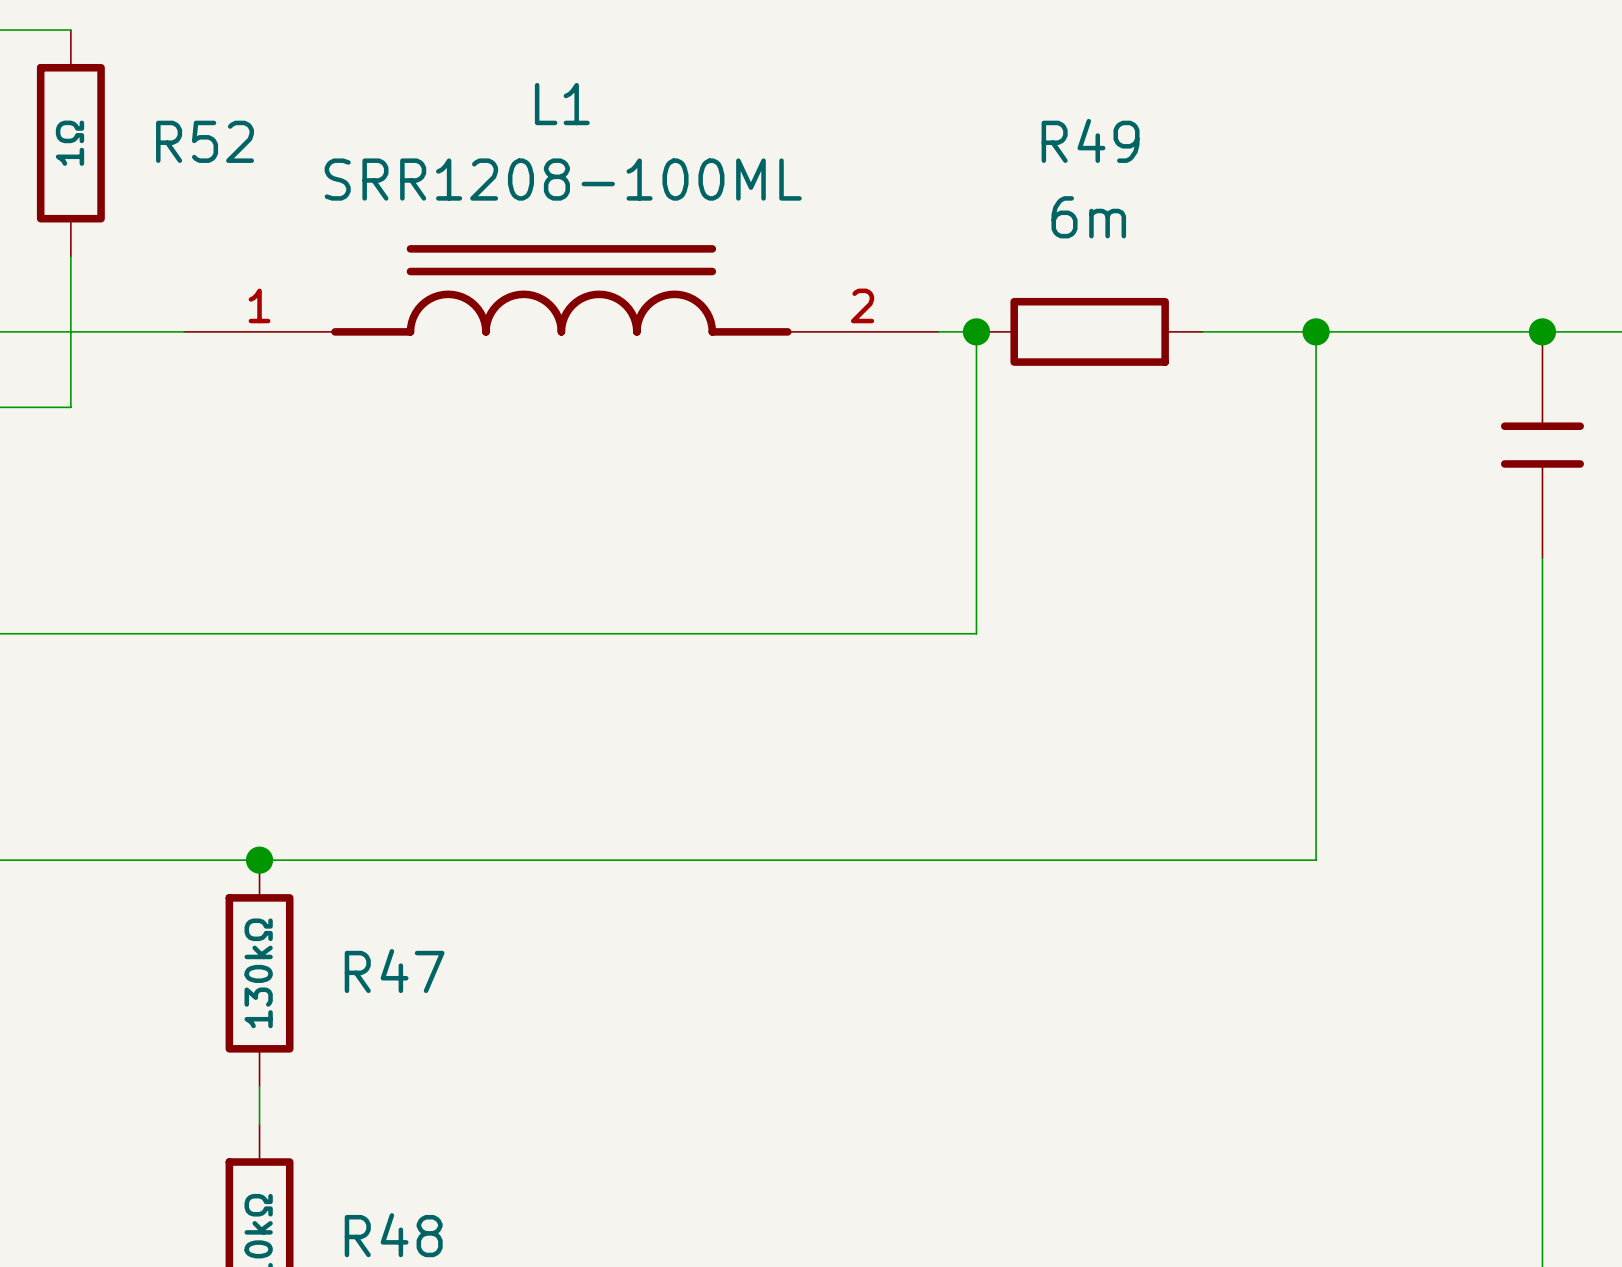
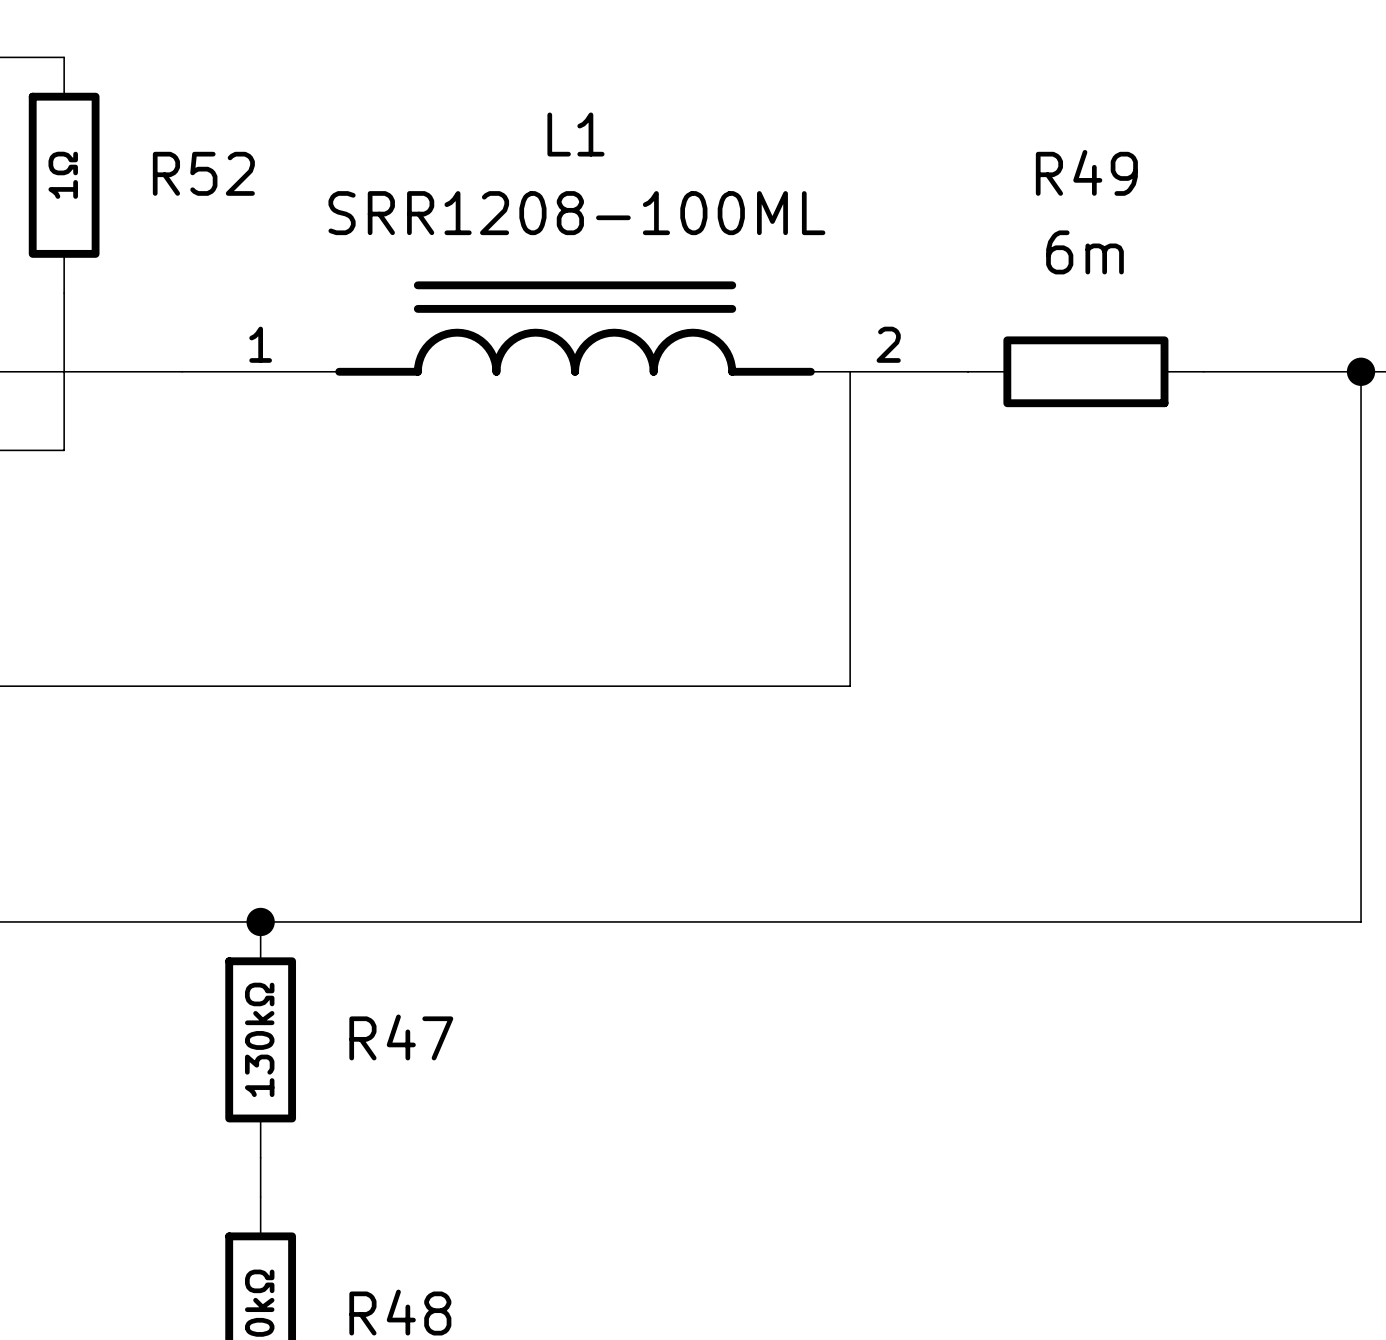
wire: (938, 331) (976, 331) (976, 633) (825, 633) -> (850, 371) (850, 686)
junction: (976, 331) -> none
R49 position: (1089, 331) -> (1085, 371)

